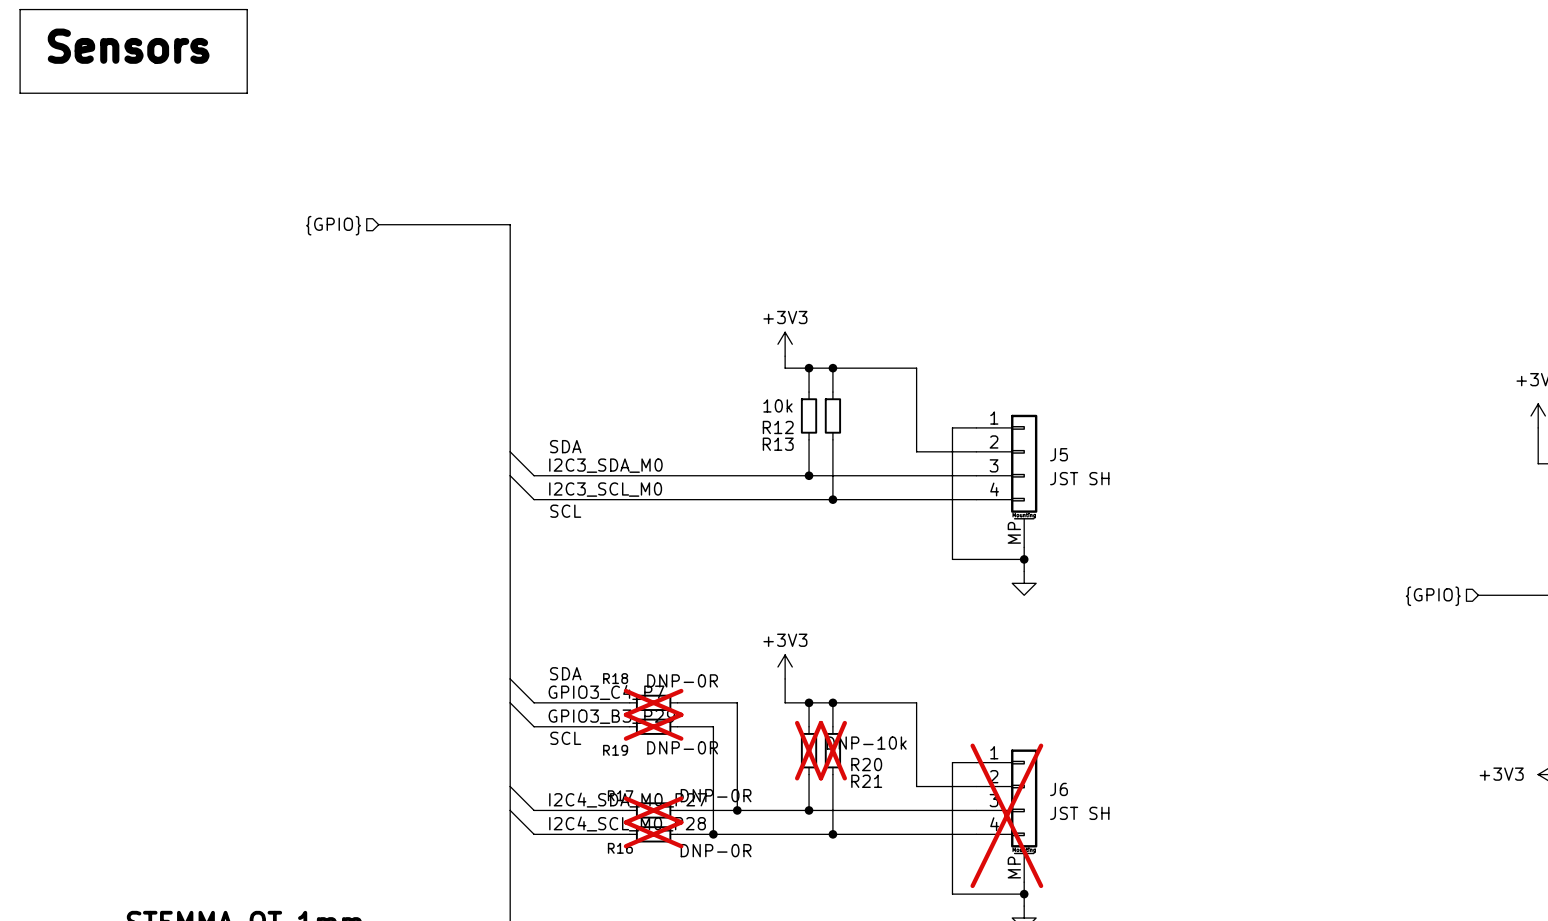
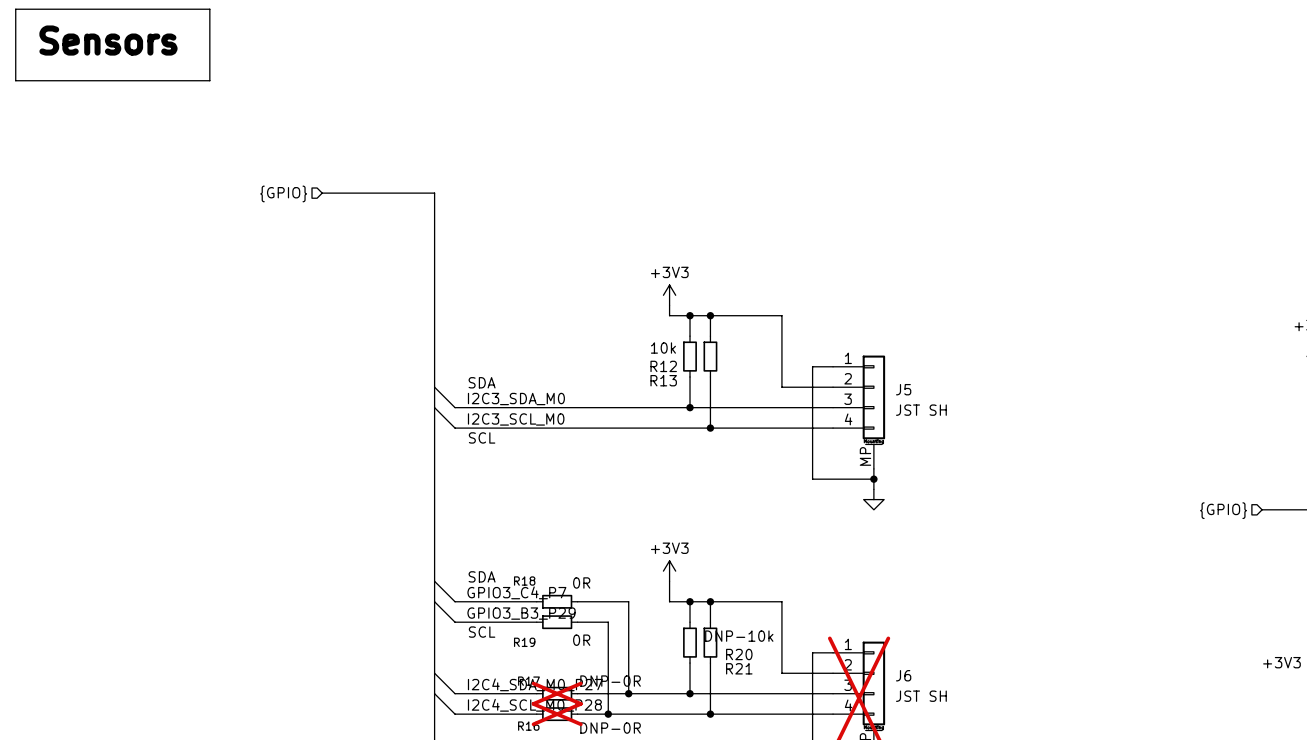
R18 value: DNP-0R (682, 680) -> 0R (581, 582)
R18 do-not-place cross: (653, 702) -> none
R19 do-not-place cross: (653, 726) -> none
R19 value: DNP-0R (682, 747) -> 0R (581, 640)
R20 do-not-place cross: (809, 750) -> none
R21 do-not-place cross: (832, 750) -> none

